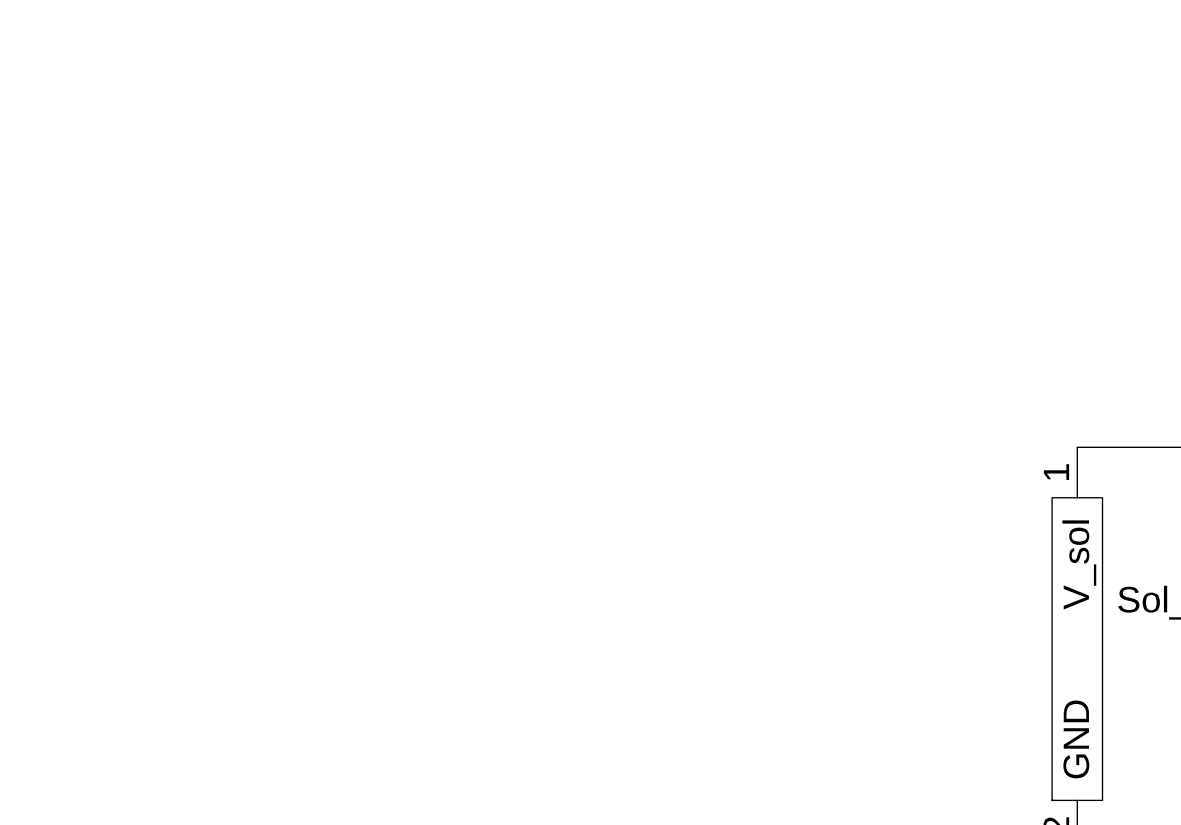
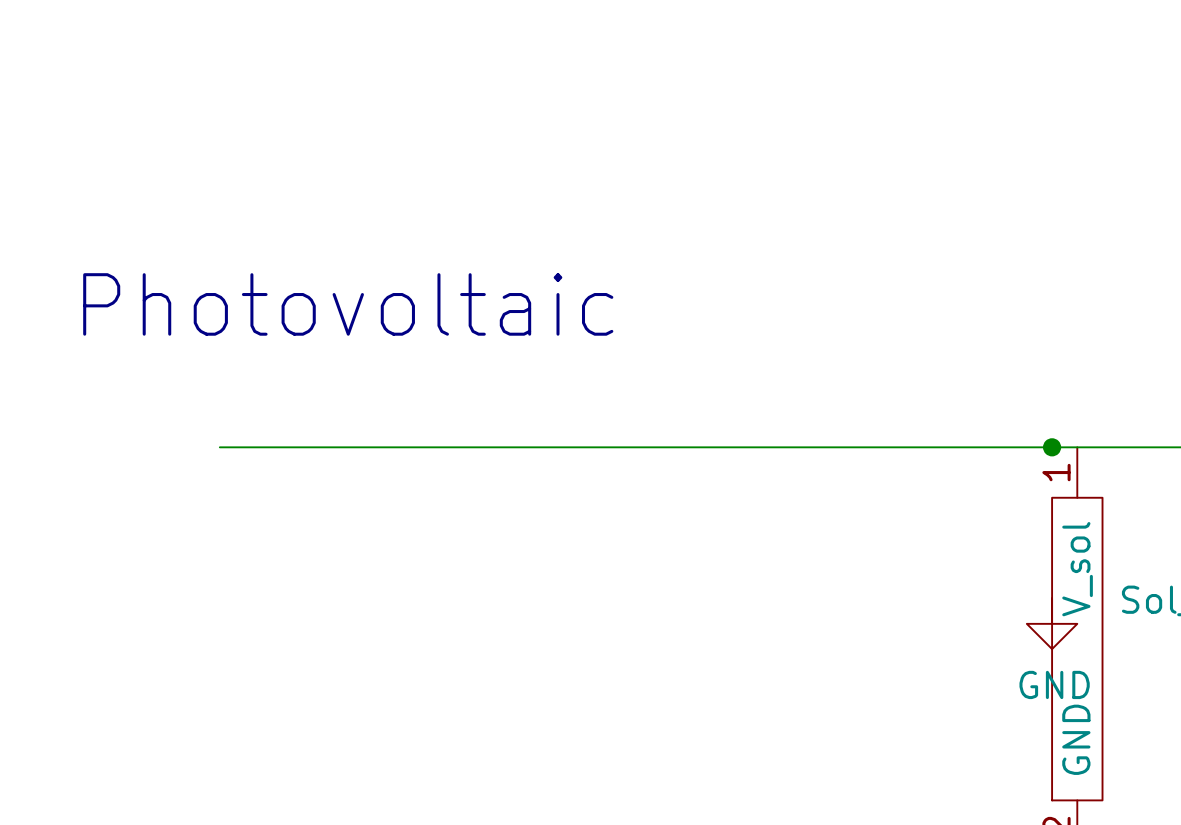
text: none -> Photovoltaic (348, 304)
wire: none -> (219, 447) (1077, 447)
junction: none -> (1052, 447)
power symbol: none -> GND (1052, 623)

